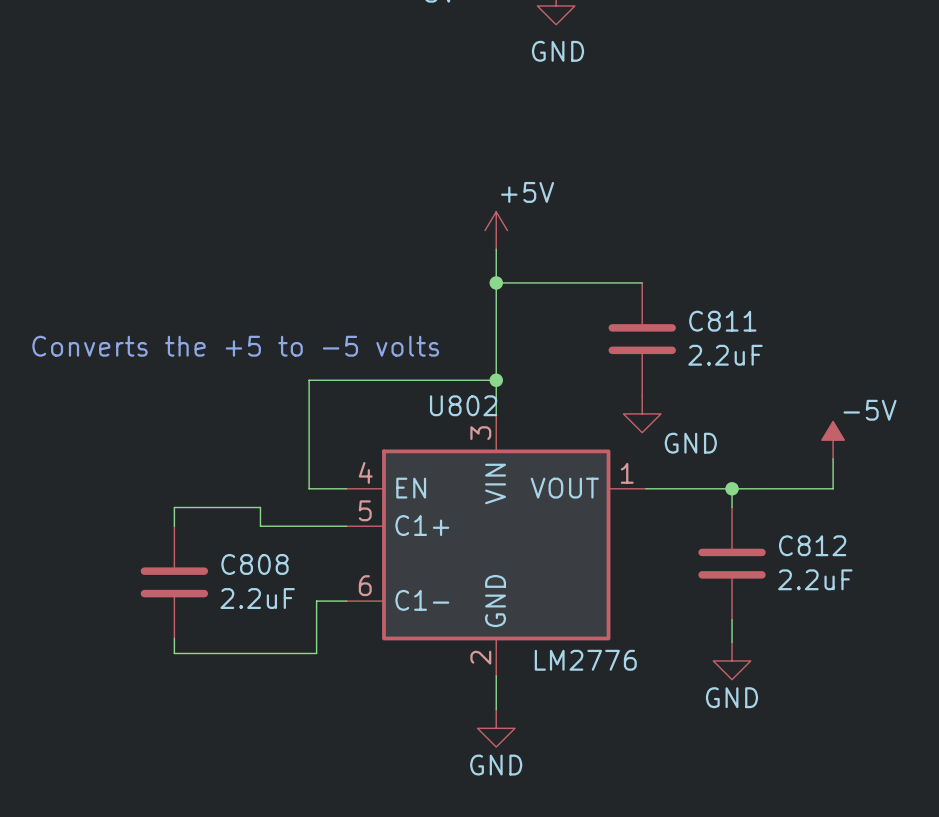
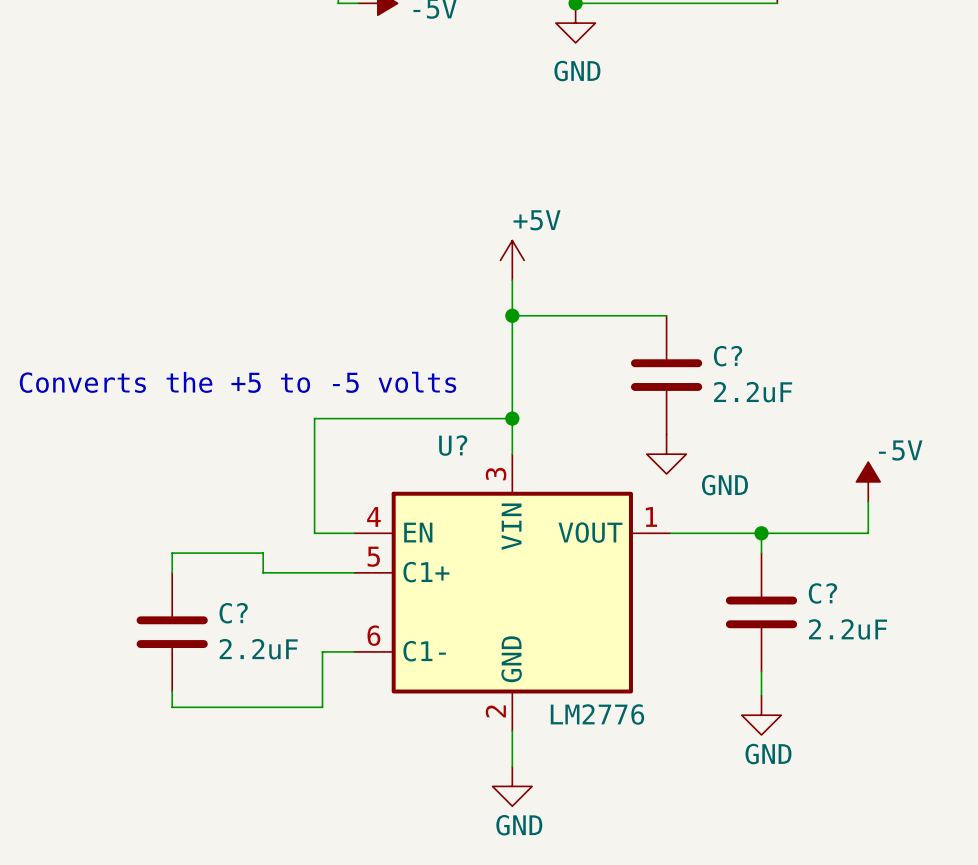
C811 name: C811 (722, 321) -> C? (728, 356)
U802 name: U802 (463, 405) -> U? (453, 445)
C812 name: C812 (812, 545) -> C? (822, 593)
C808 name: C808 (254, 564) -> C? (233, 613)

